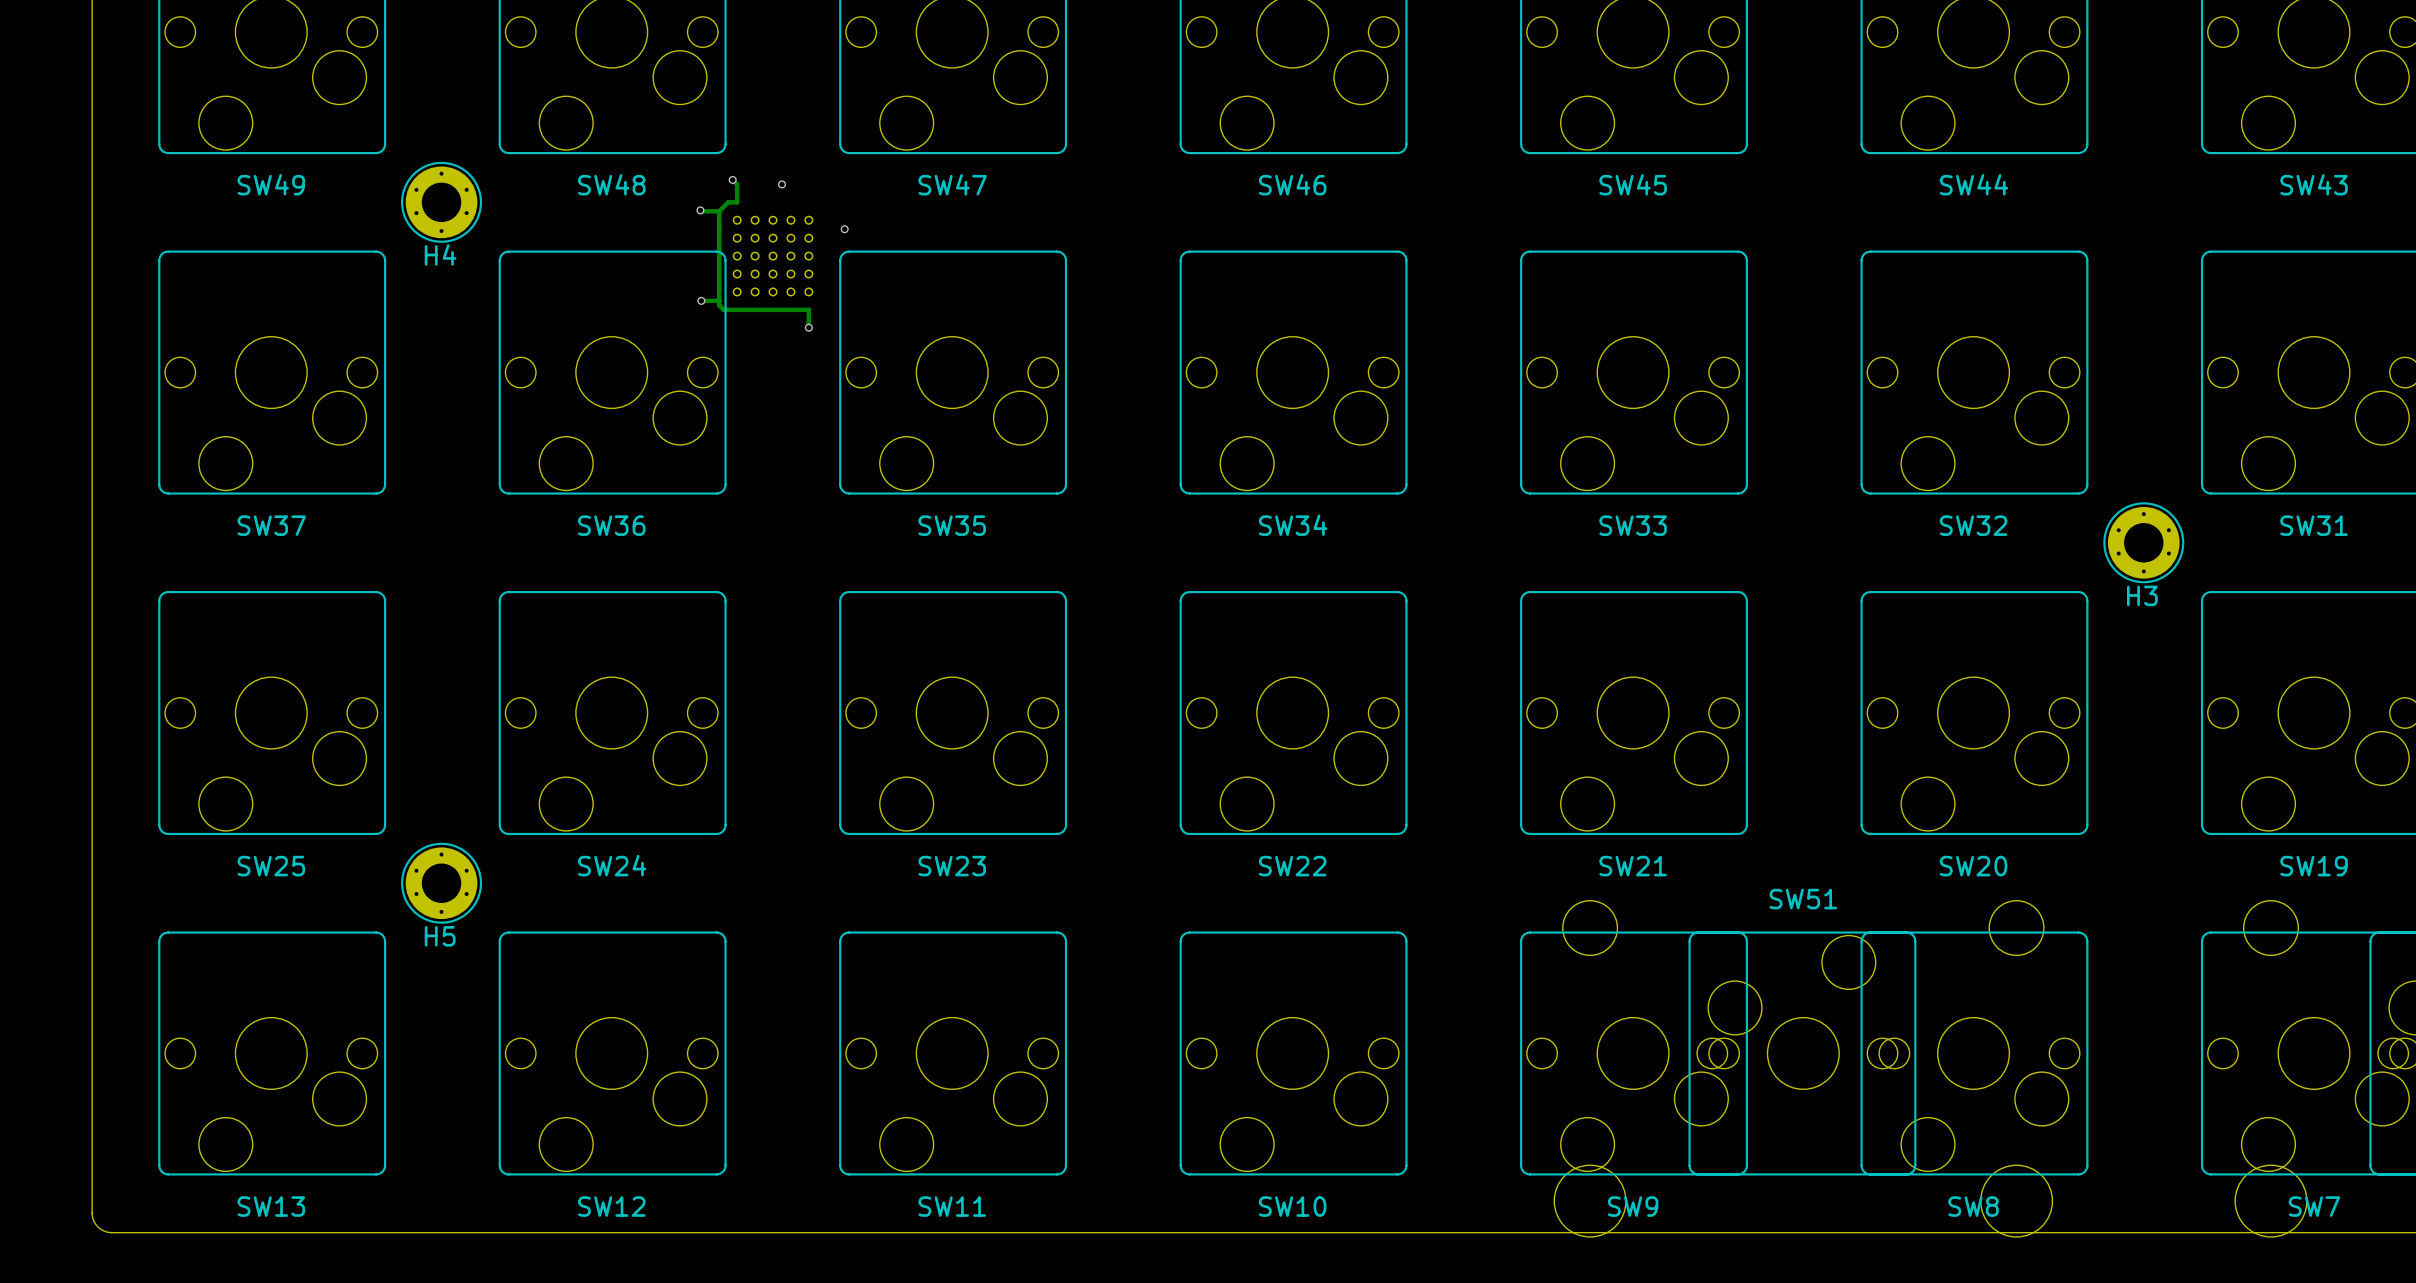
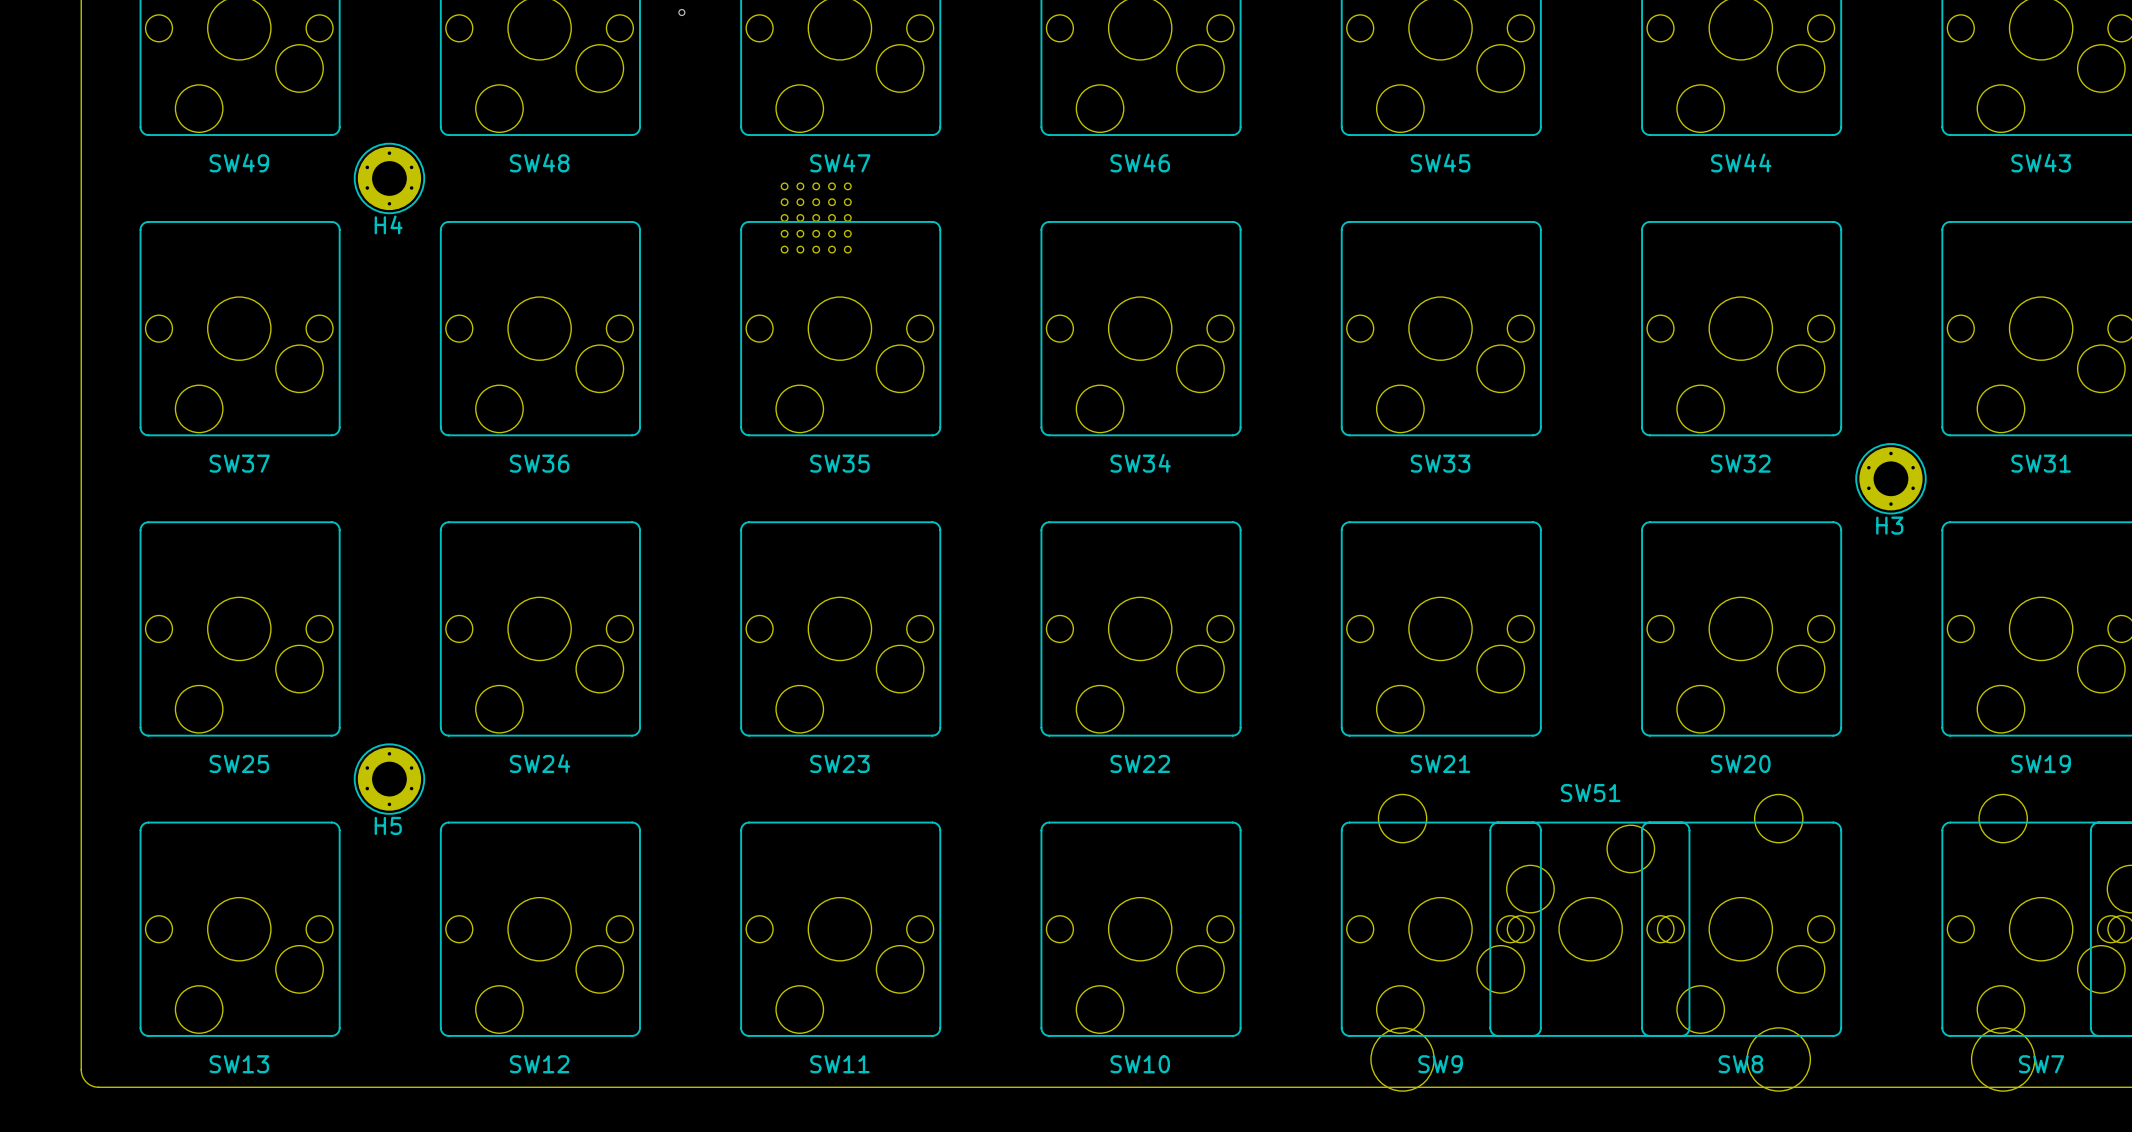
via: none -> (681, 12)
track: (732, 179) (737, 184) (737, 202) (728, 202) (719, 211) -> none
via: (732, 179) -> none
via: (781, 184) -> none
track: (700, 210) (719, 211) -> none
via: (700, 210) -> none
track: (719, 211) (719, 305) (723, 309) (808, 309) (808, 327) -> none
via: (844, 229) -> none
part position: (773, 256) -> (816, 217)
via: (701, 300) -> none
track: (719, 300) (701, 300) -> none
via: (808, 327) -> none

